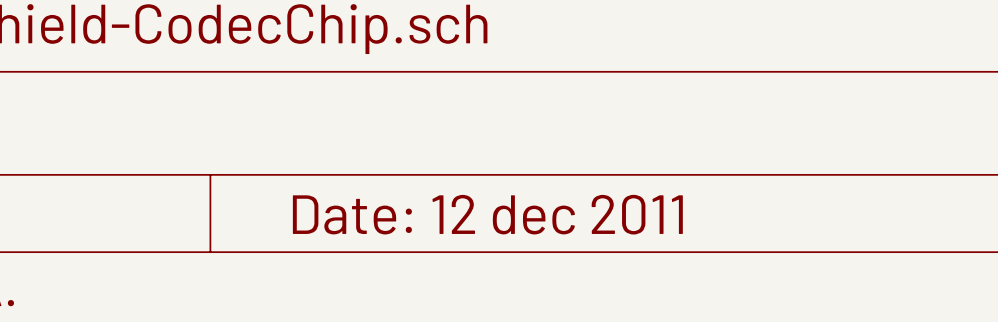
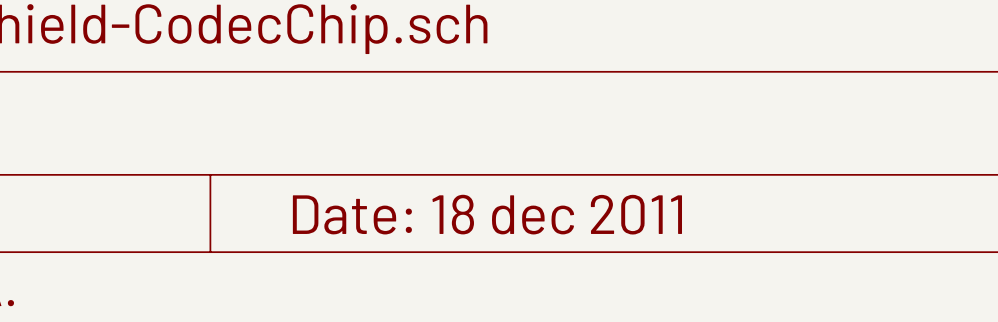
title block: Date: 12 dec 2011 (487, 214) -> Date: 18 dec 2011 (487, 214)

